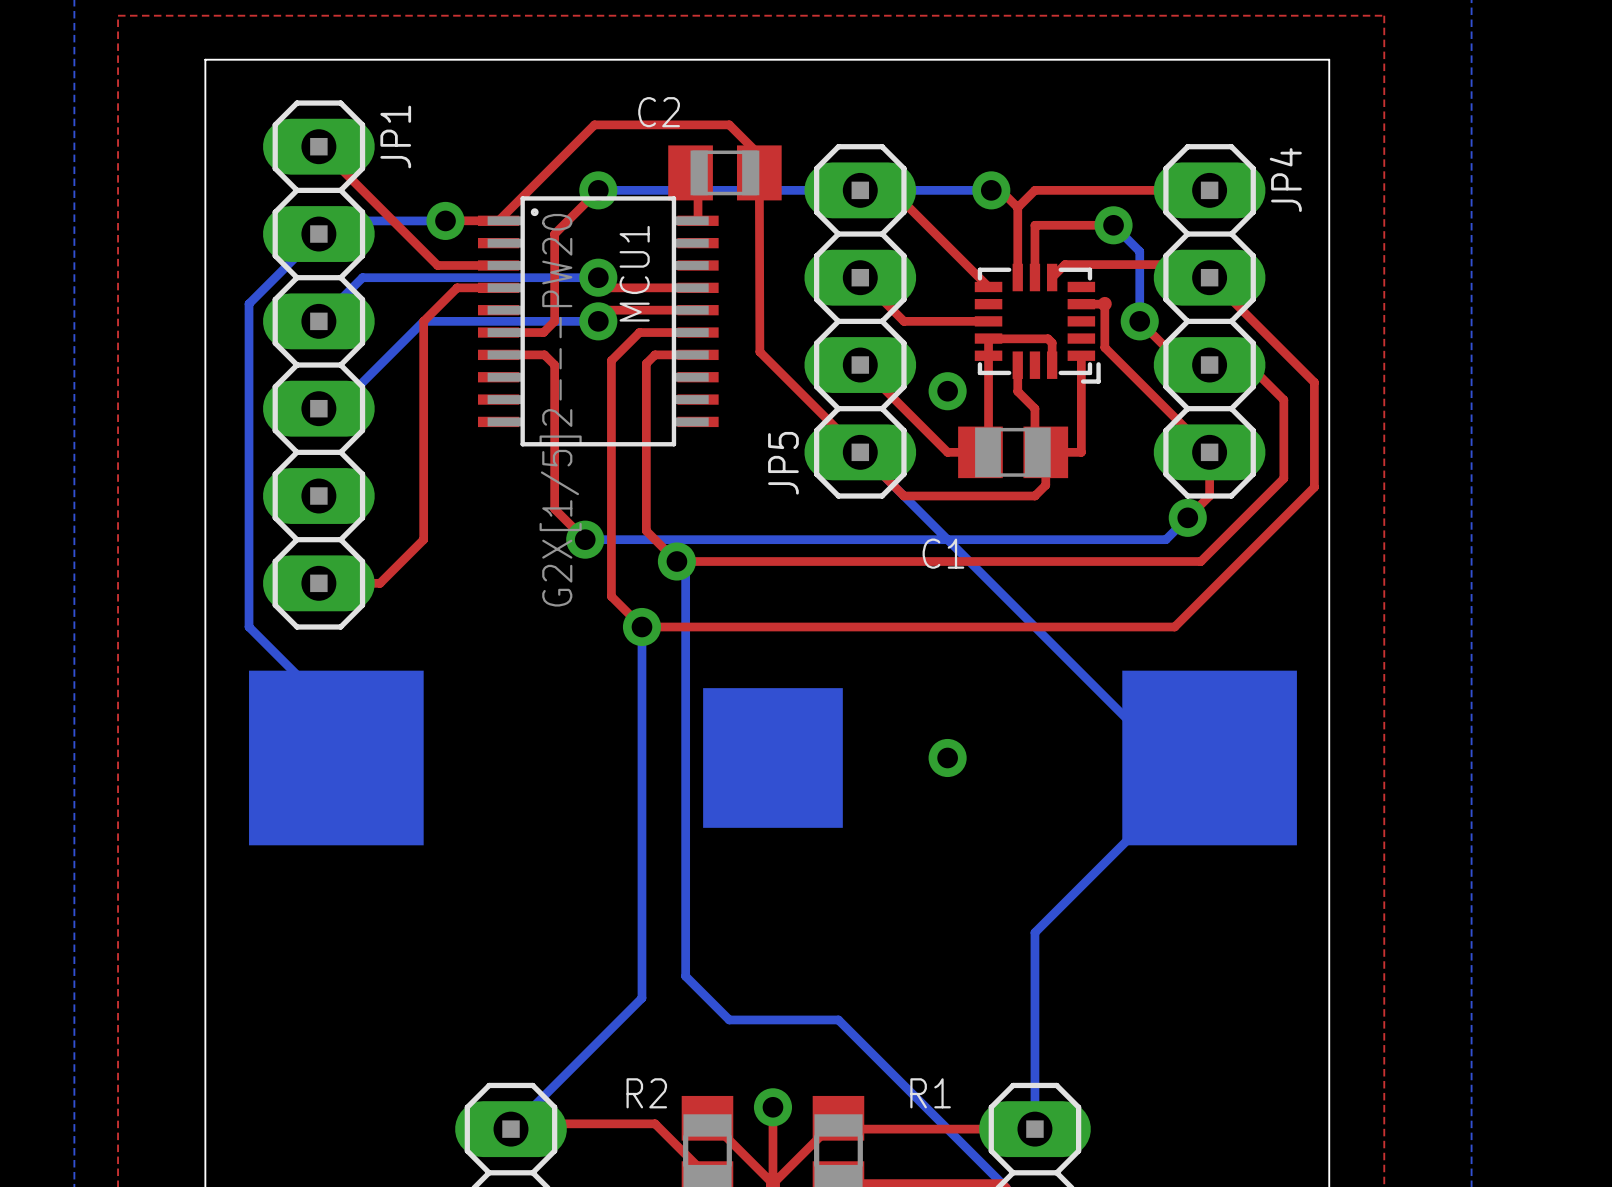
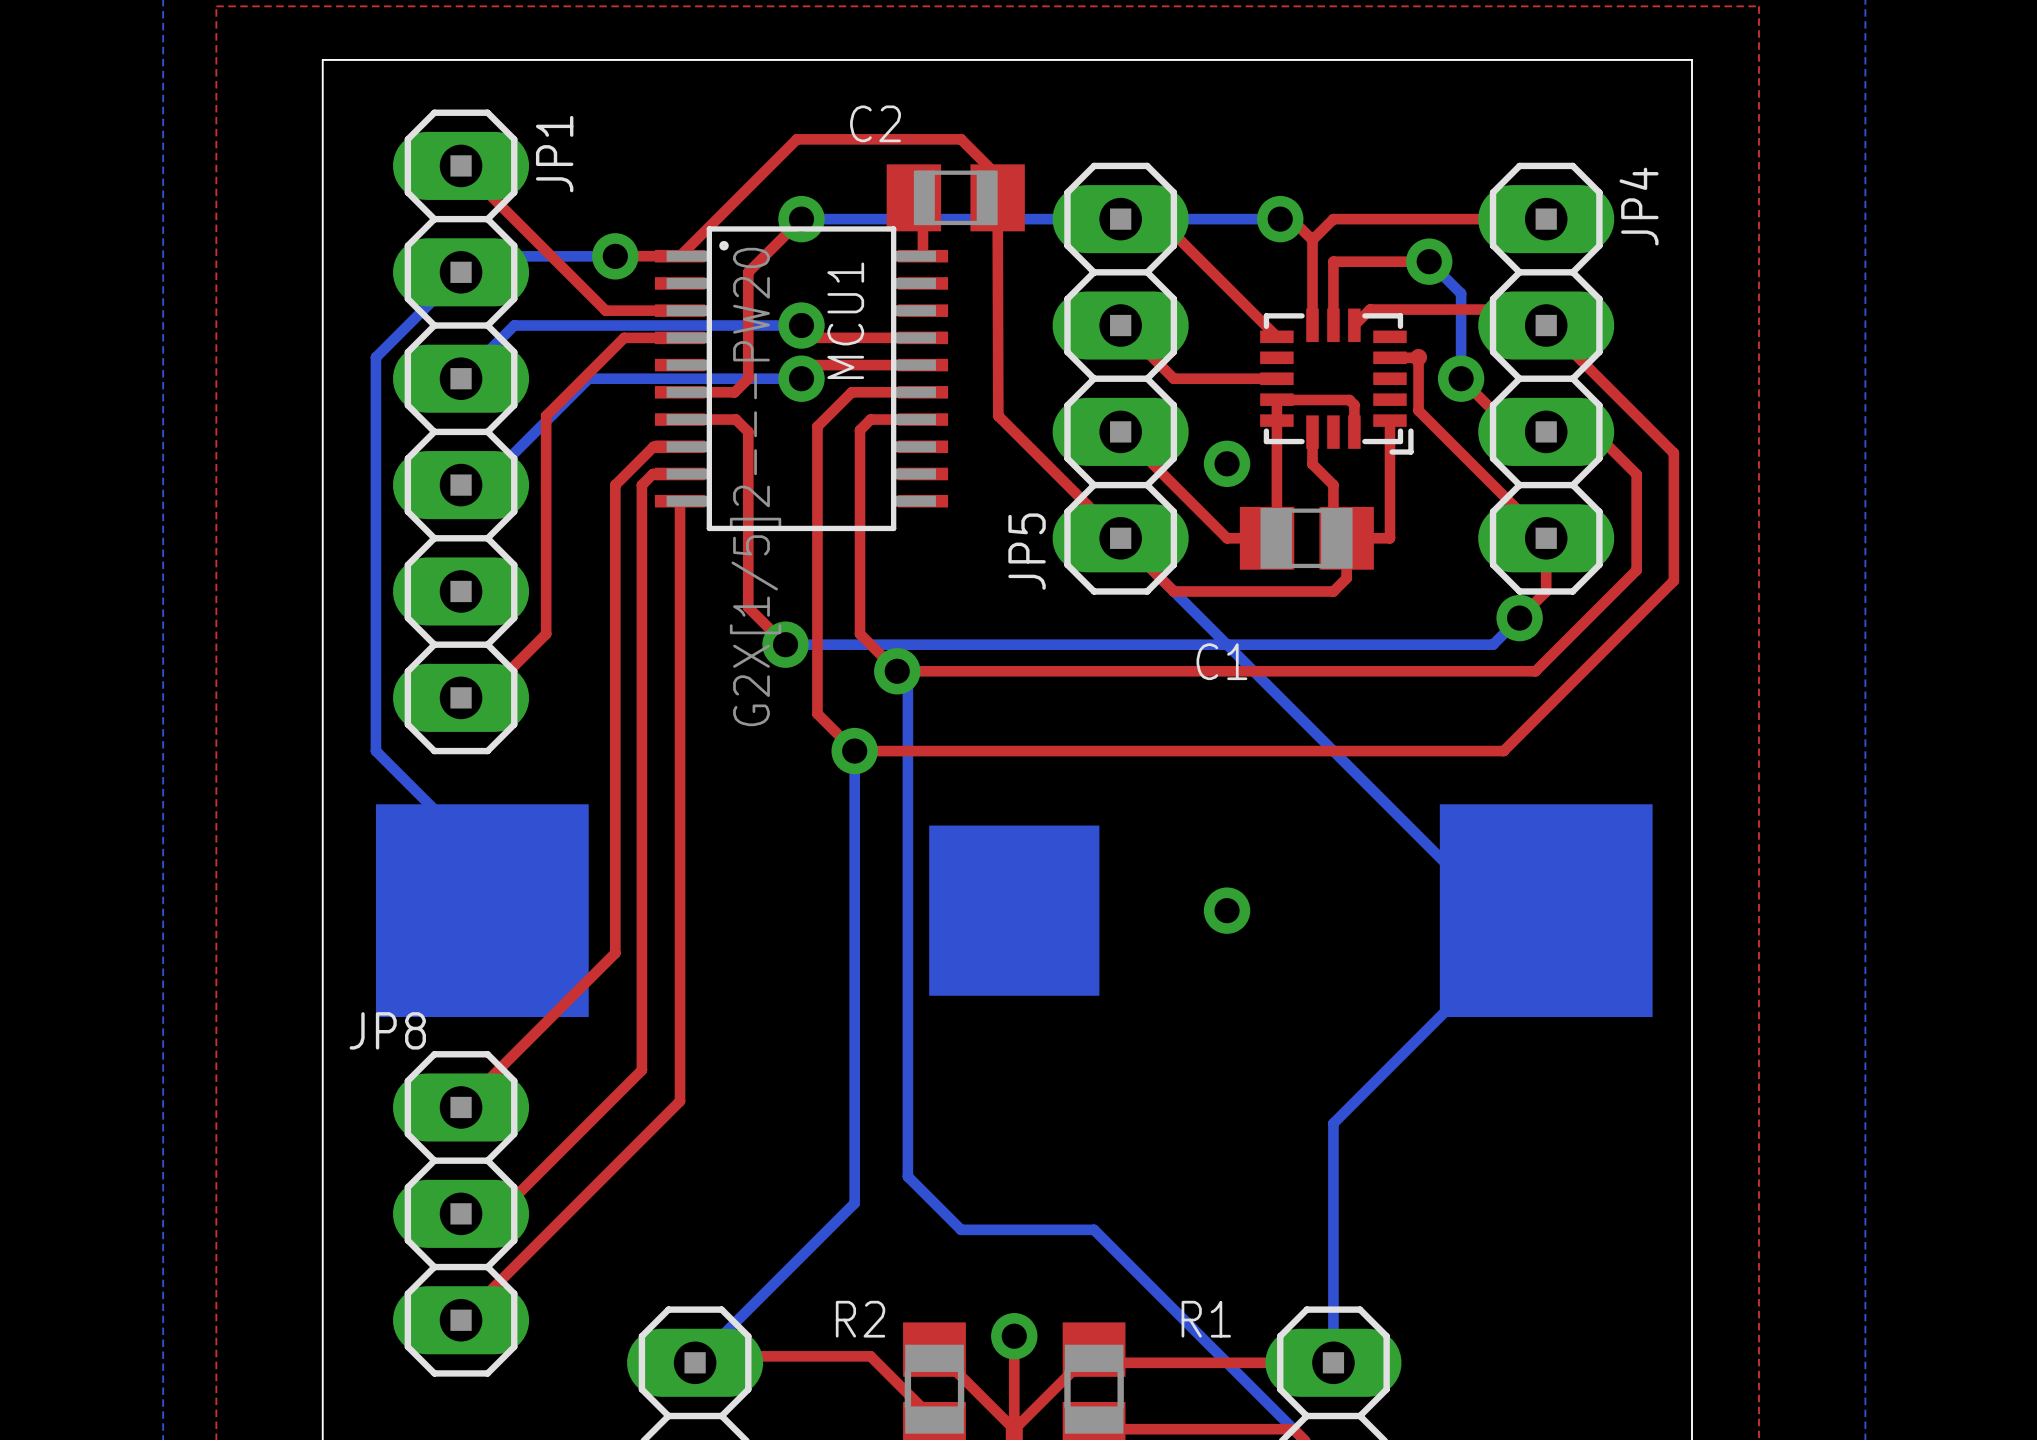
top track: (457, 287) (423, 321) (423, 539) (380, 583) (336, 583) -> (629, 337) (624, 337) (546, 415) (546, 634) (482, 697)
top track: none -> (680, 446) (653, 446) (615, 485) (615, 953) (461, 1107)
top track: none -> (680, 474) (653, 474) (641, 485) (641, 1070) (498, 1213) (461, 1213)
top track: none -> (680, 501) (680, 1101) (461, 1320)
JP8: none -> (461, 1213)

